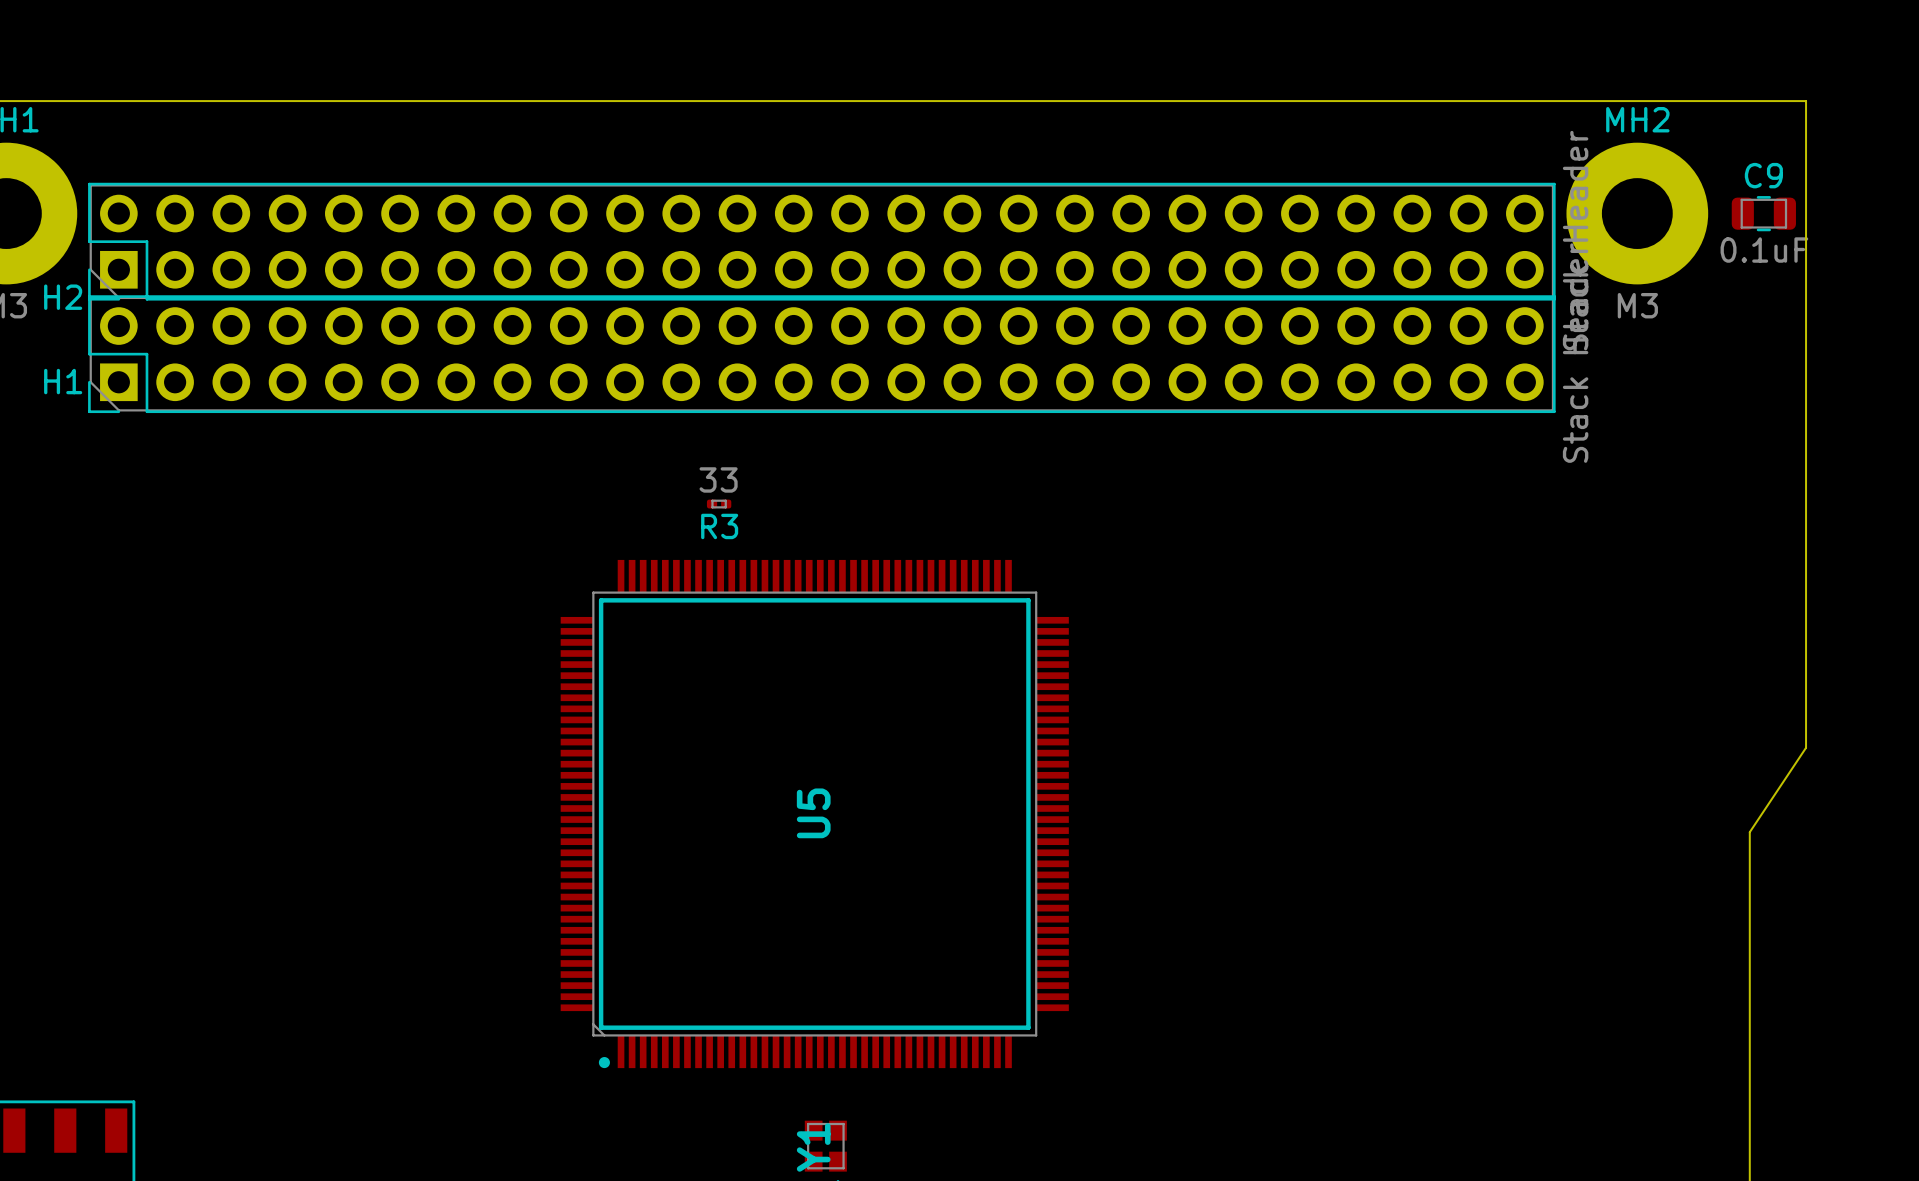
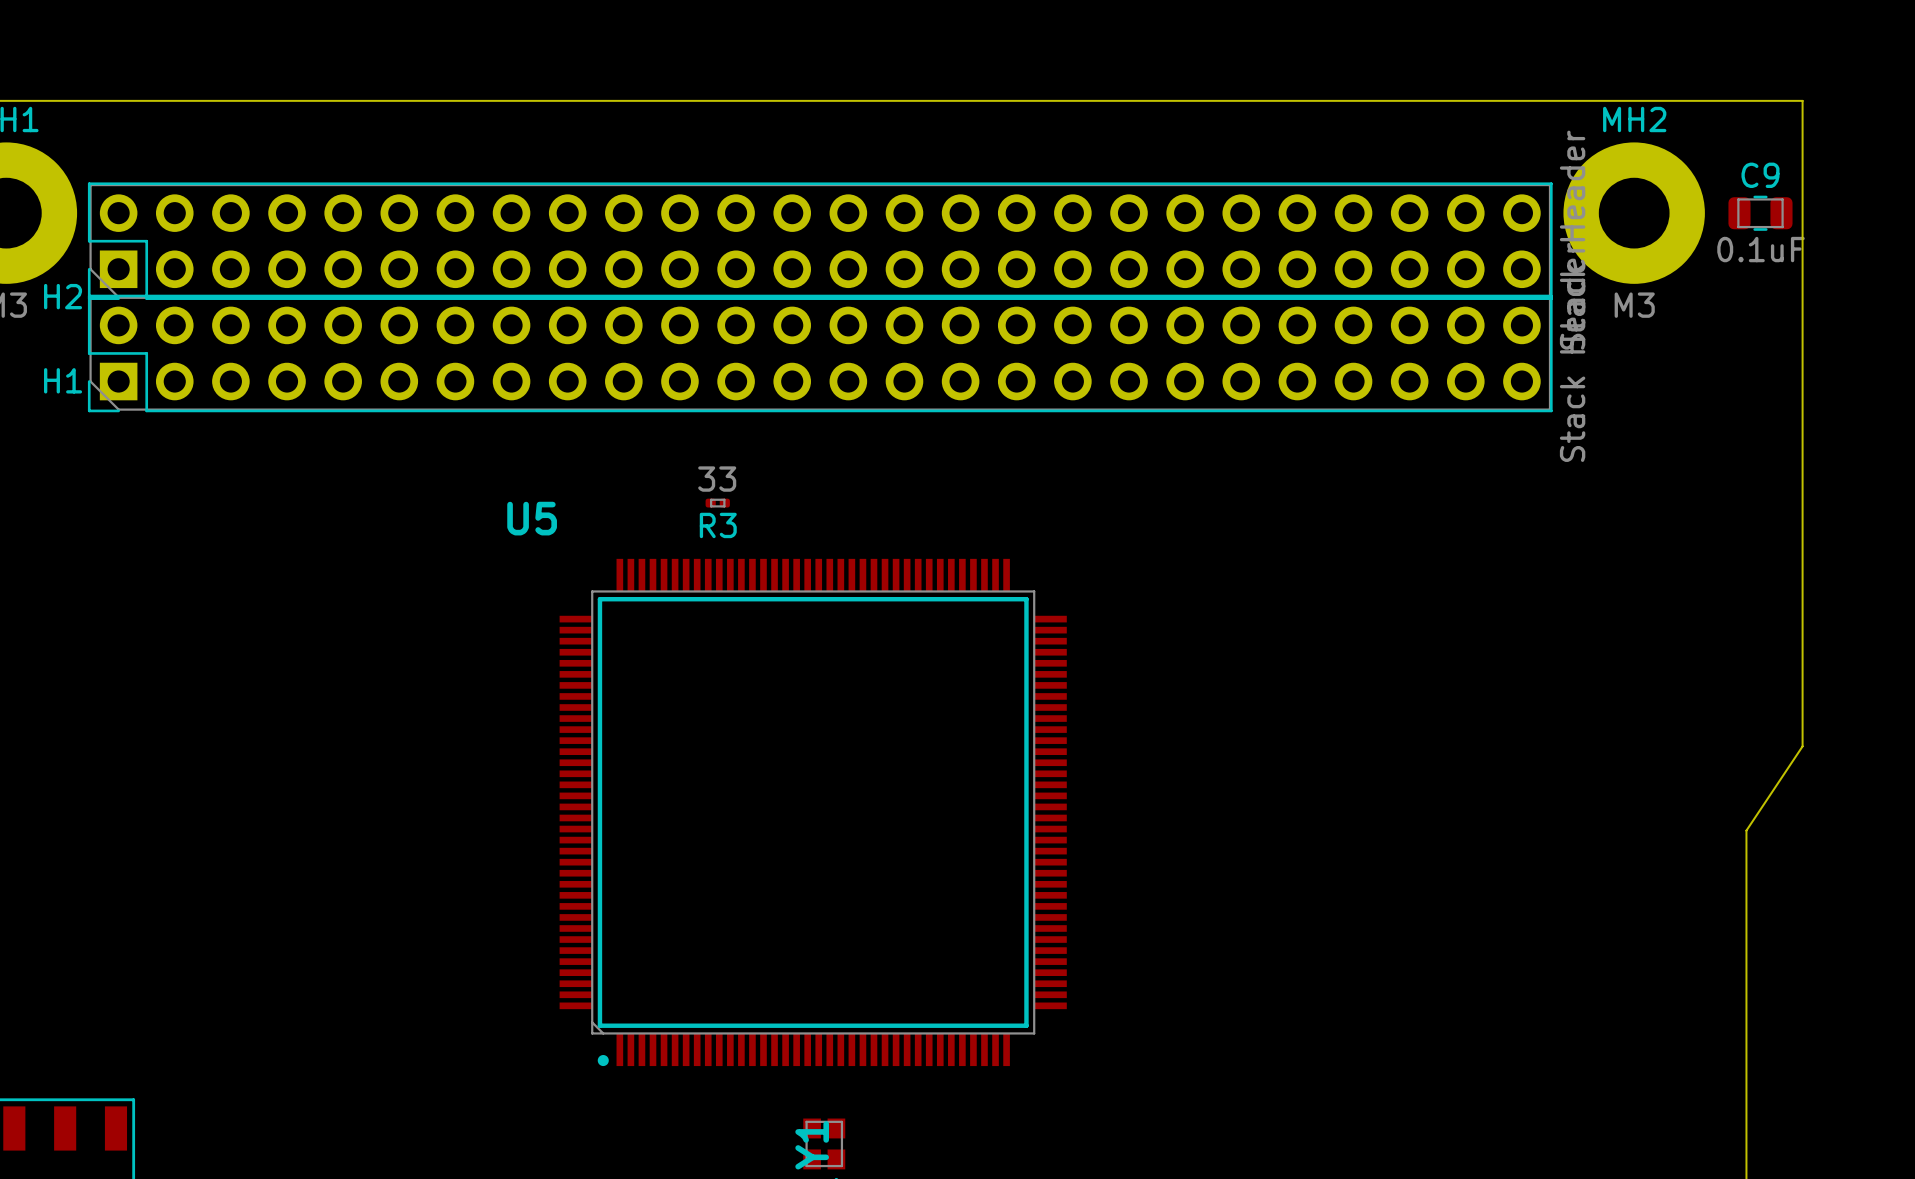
U5 name rotation: 0° (813, 813) -> 90° clockwise (532, 518)
U5 name position: U5 (813, 813) -> U5 (532, 518)

